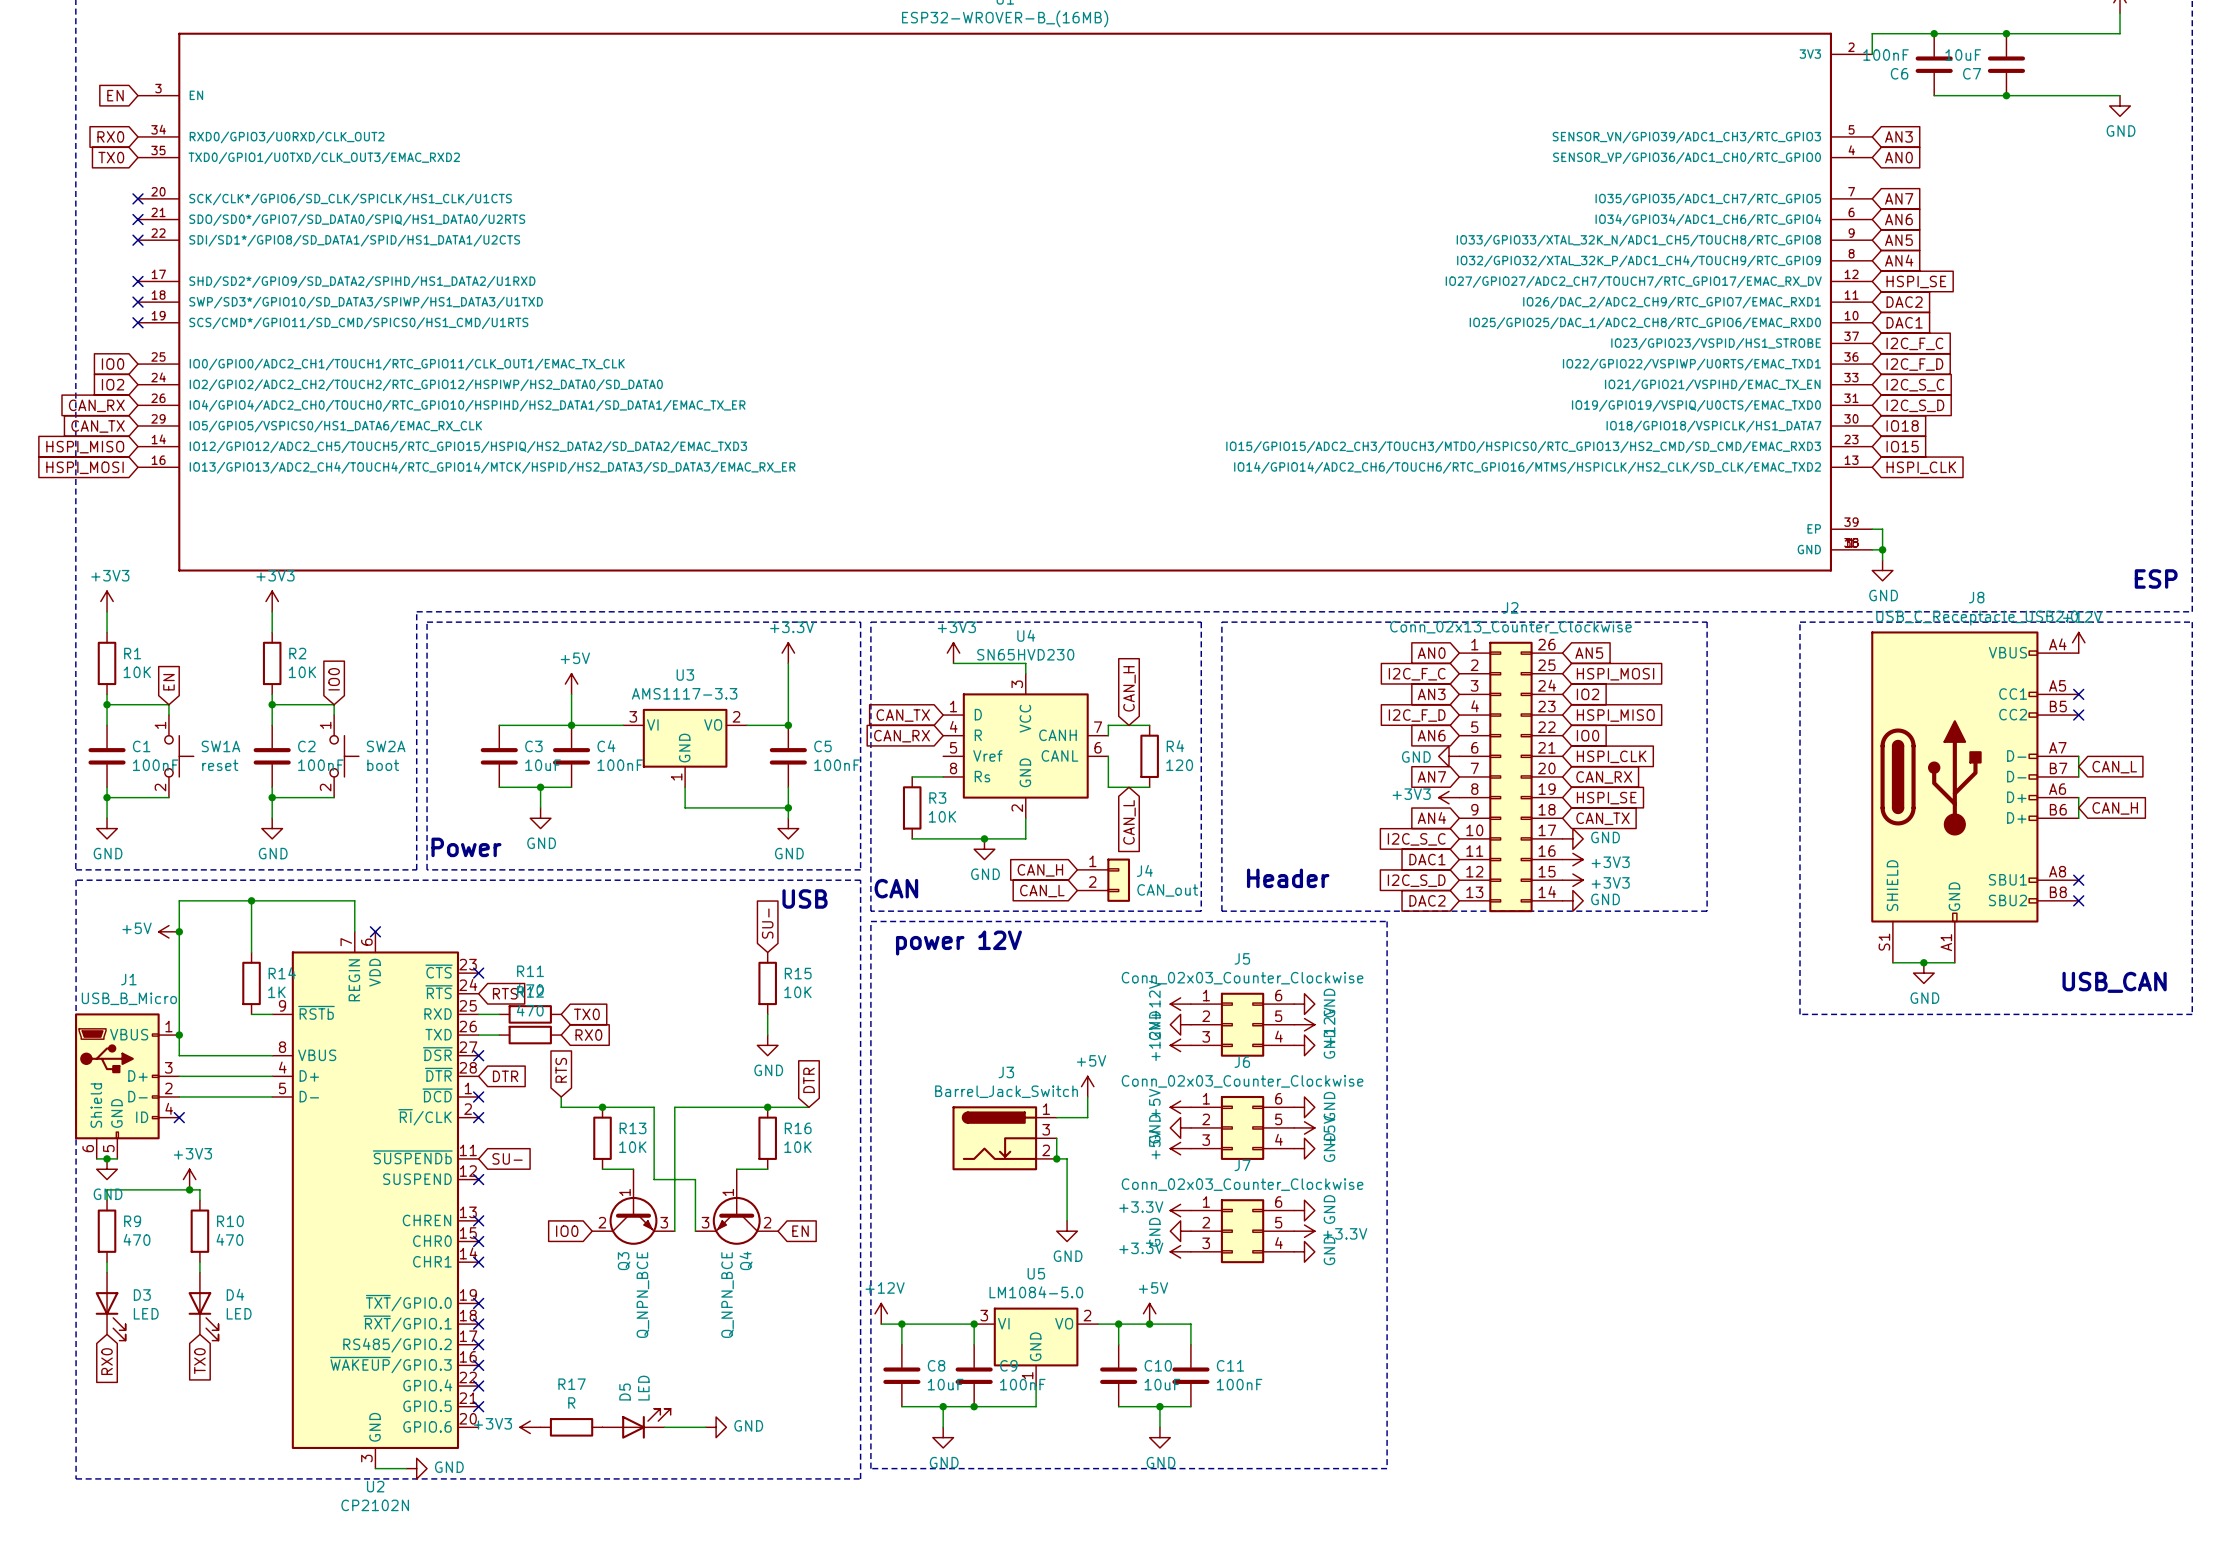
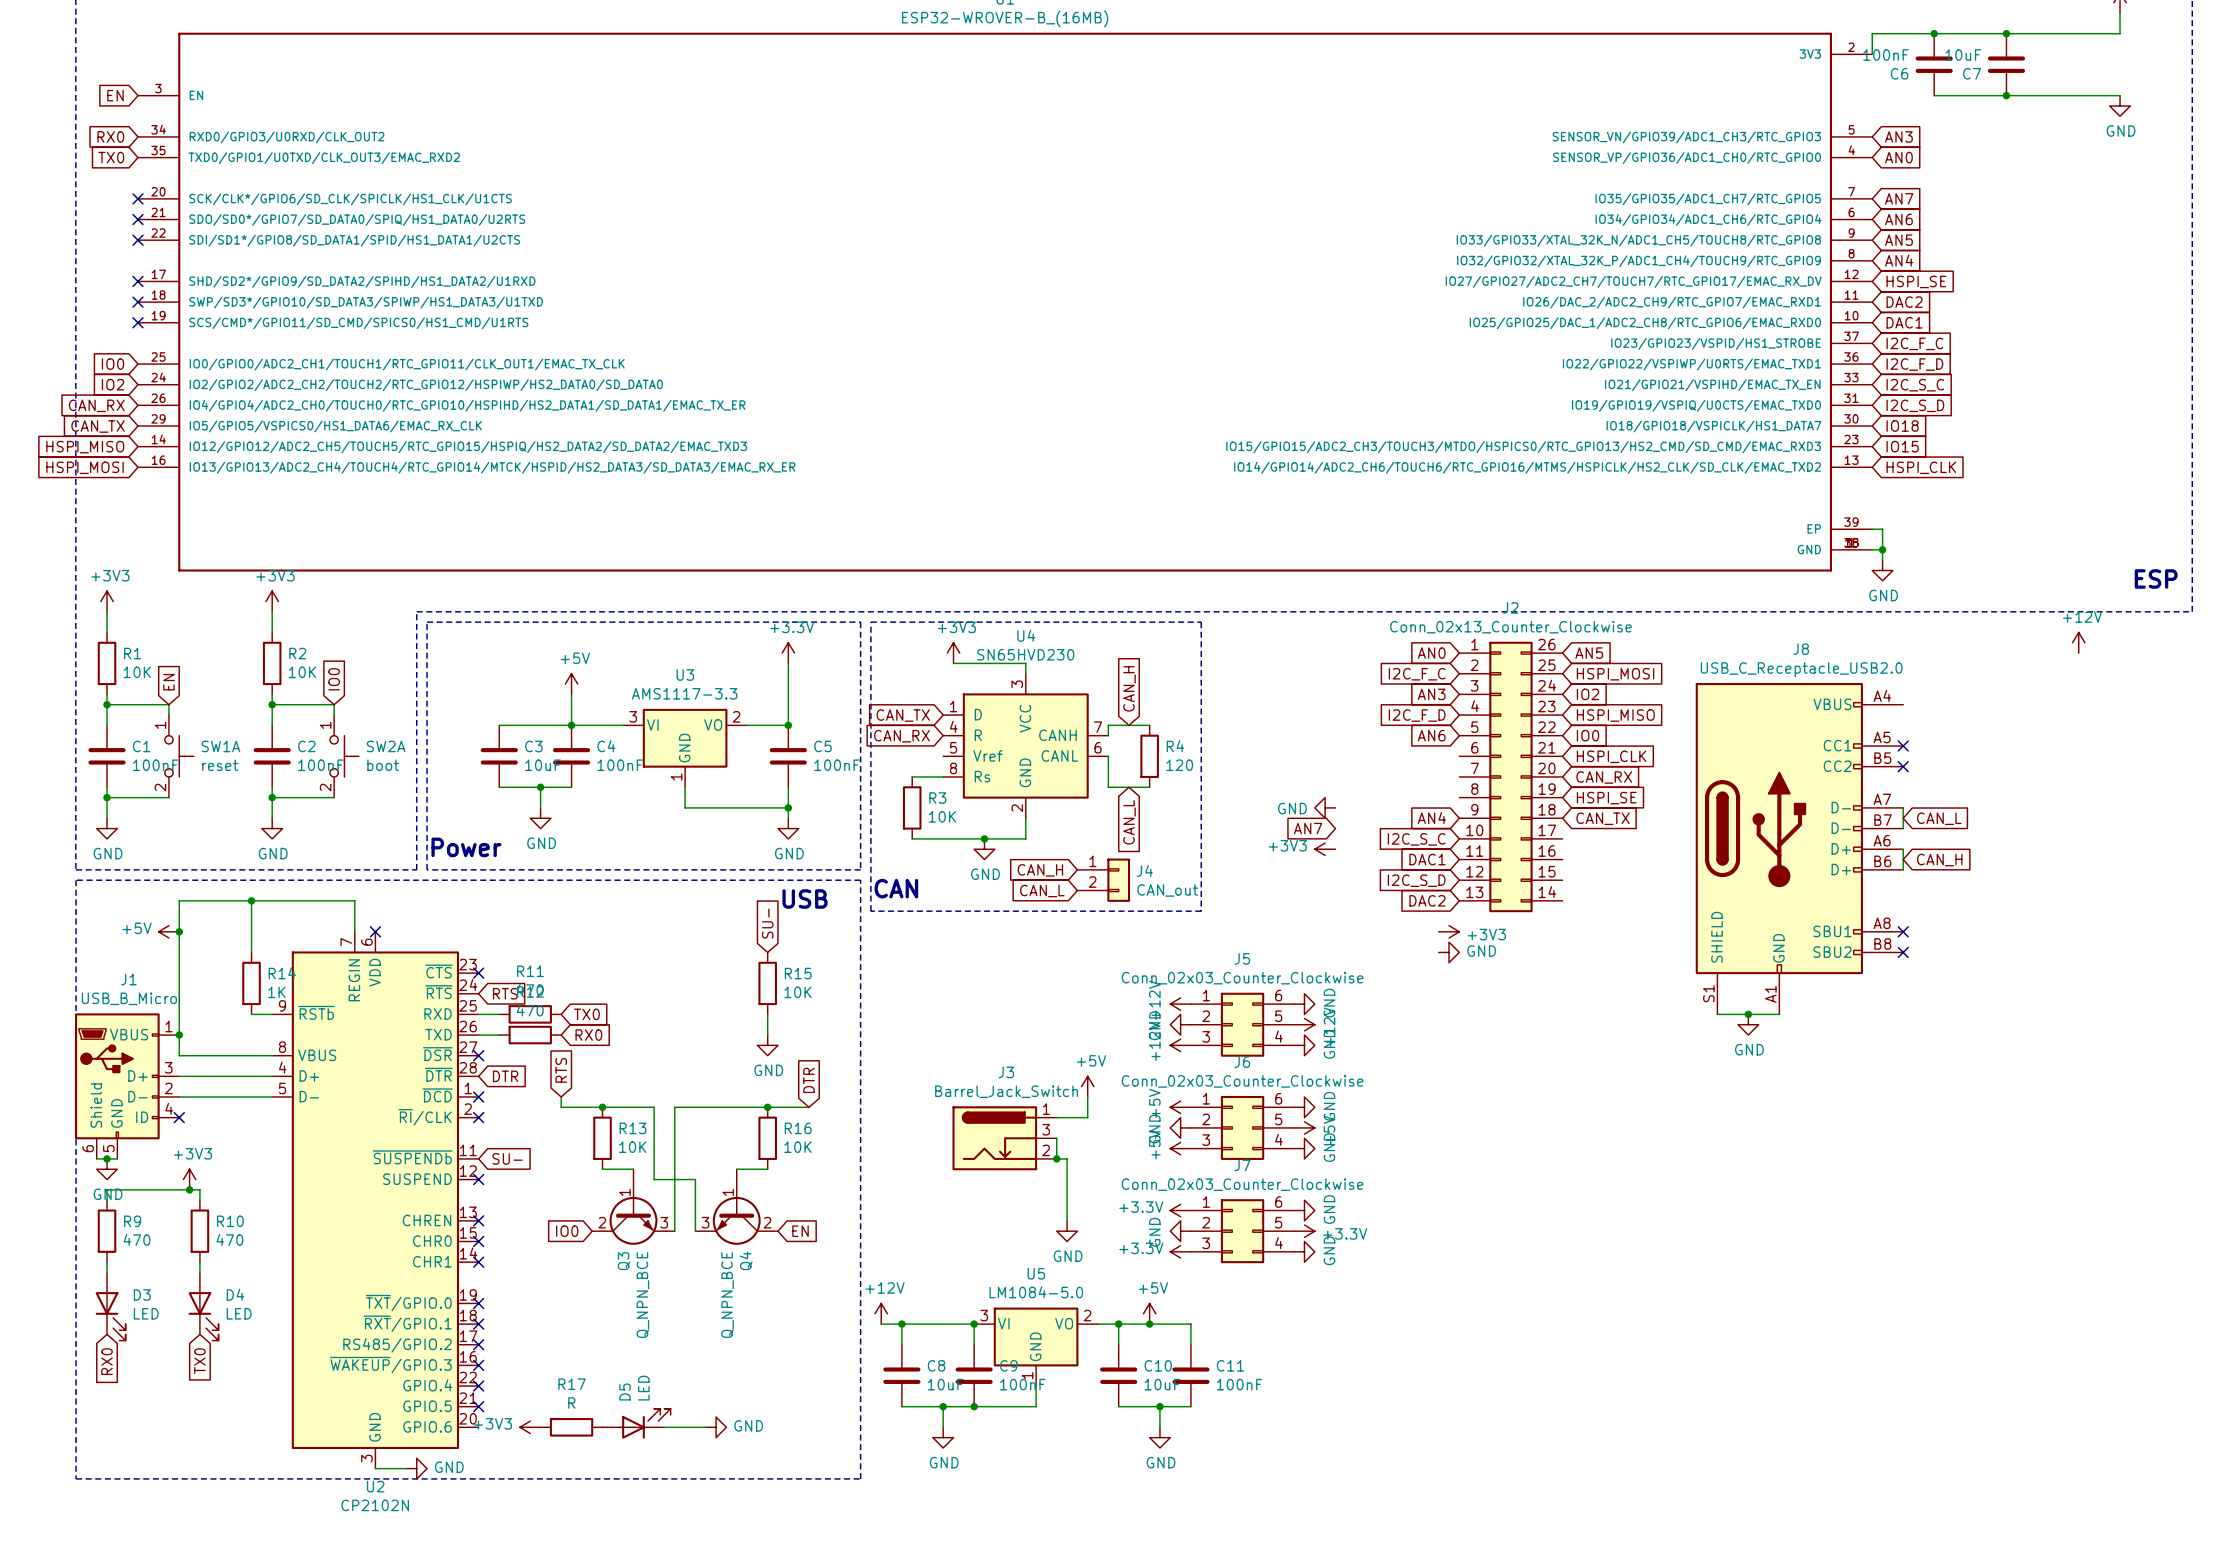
line: (1221, 622) (1707, 622) (1707, 911) (1221, 911) (1221, 622) -> none
line: (1799, 622) (2192, 622) (2192, 1014) (1799, 1014) (1799, 622) -> none
no-connect mark: (2078, 694) -> none
no-connect mark: (2078, 715) -> none
no-connect mark: none -> (1903, 746)
power symbol: GND (1449, 756) -> none
no-connect mark: none -> (1903, 766)
global label position: CAN_L (2114, 767) -> CAN_L (1939, 818)
global label position: AN7 (1431, 776) -> AN7 (1308, 828)
power symbol: +3V3 (1449, 797) -> none
J8 position: (1974, 797) -> (1799, 848)
power symbol: none -> GND (1325, 807)
global label position: CAN_H (2115, 808) -> CAN_H (1939, 860)
power symbol: GND (1572, 838) -> none
power symbol: none -> +3V3 (1325, 849)
power symbol: +3V3 (1572, 859) -> none
text: Header (1288, 878) -> none
power symbol: +3V3 (1572, 880) -> none
no-connect mark: (2078, 880) -> none
power symbol: GND (1572, 900) -> none
no-connect mark: (2078, 900) -> none
line: (870, 921) (870, 1468) (1387, 1468) (1387, 921) (870, 921) -> none
power symbol: none -> +3V3 (1449, 931)
no-connect mark: none -> (1903, 931)
text: power 12V (958, 943) -> none
power symbol: none -> GND (1449, 952)
no-connect mark: none -> (1903, 952)
wire: (1892, 962) (1954, 962) -> (1717, 1014) (1779, 1014)
junction: (1923, 962) -> none
power symbol: GND (1923, 973) -> none
text: USB_CAN (2114, 982) -> none
junction: none -> (1748, 1014)
power symbol: none -> GND (1748, 1024)

